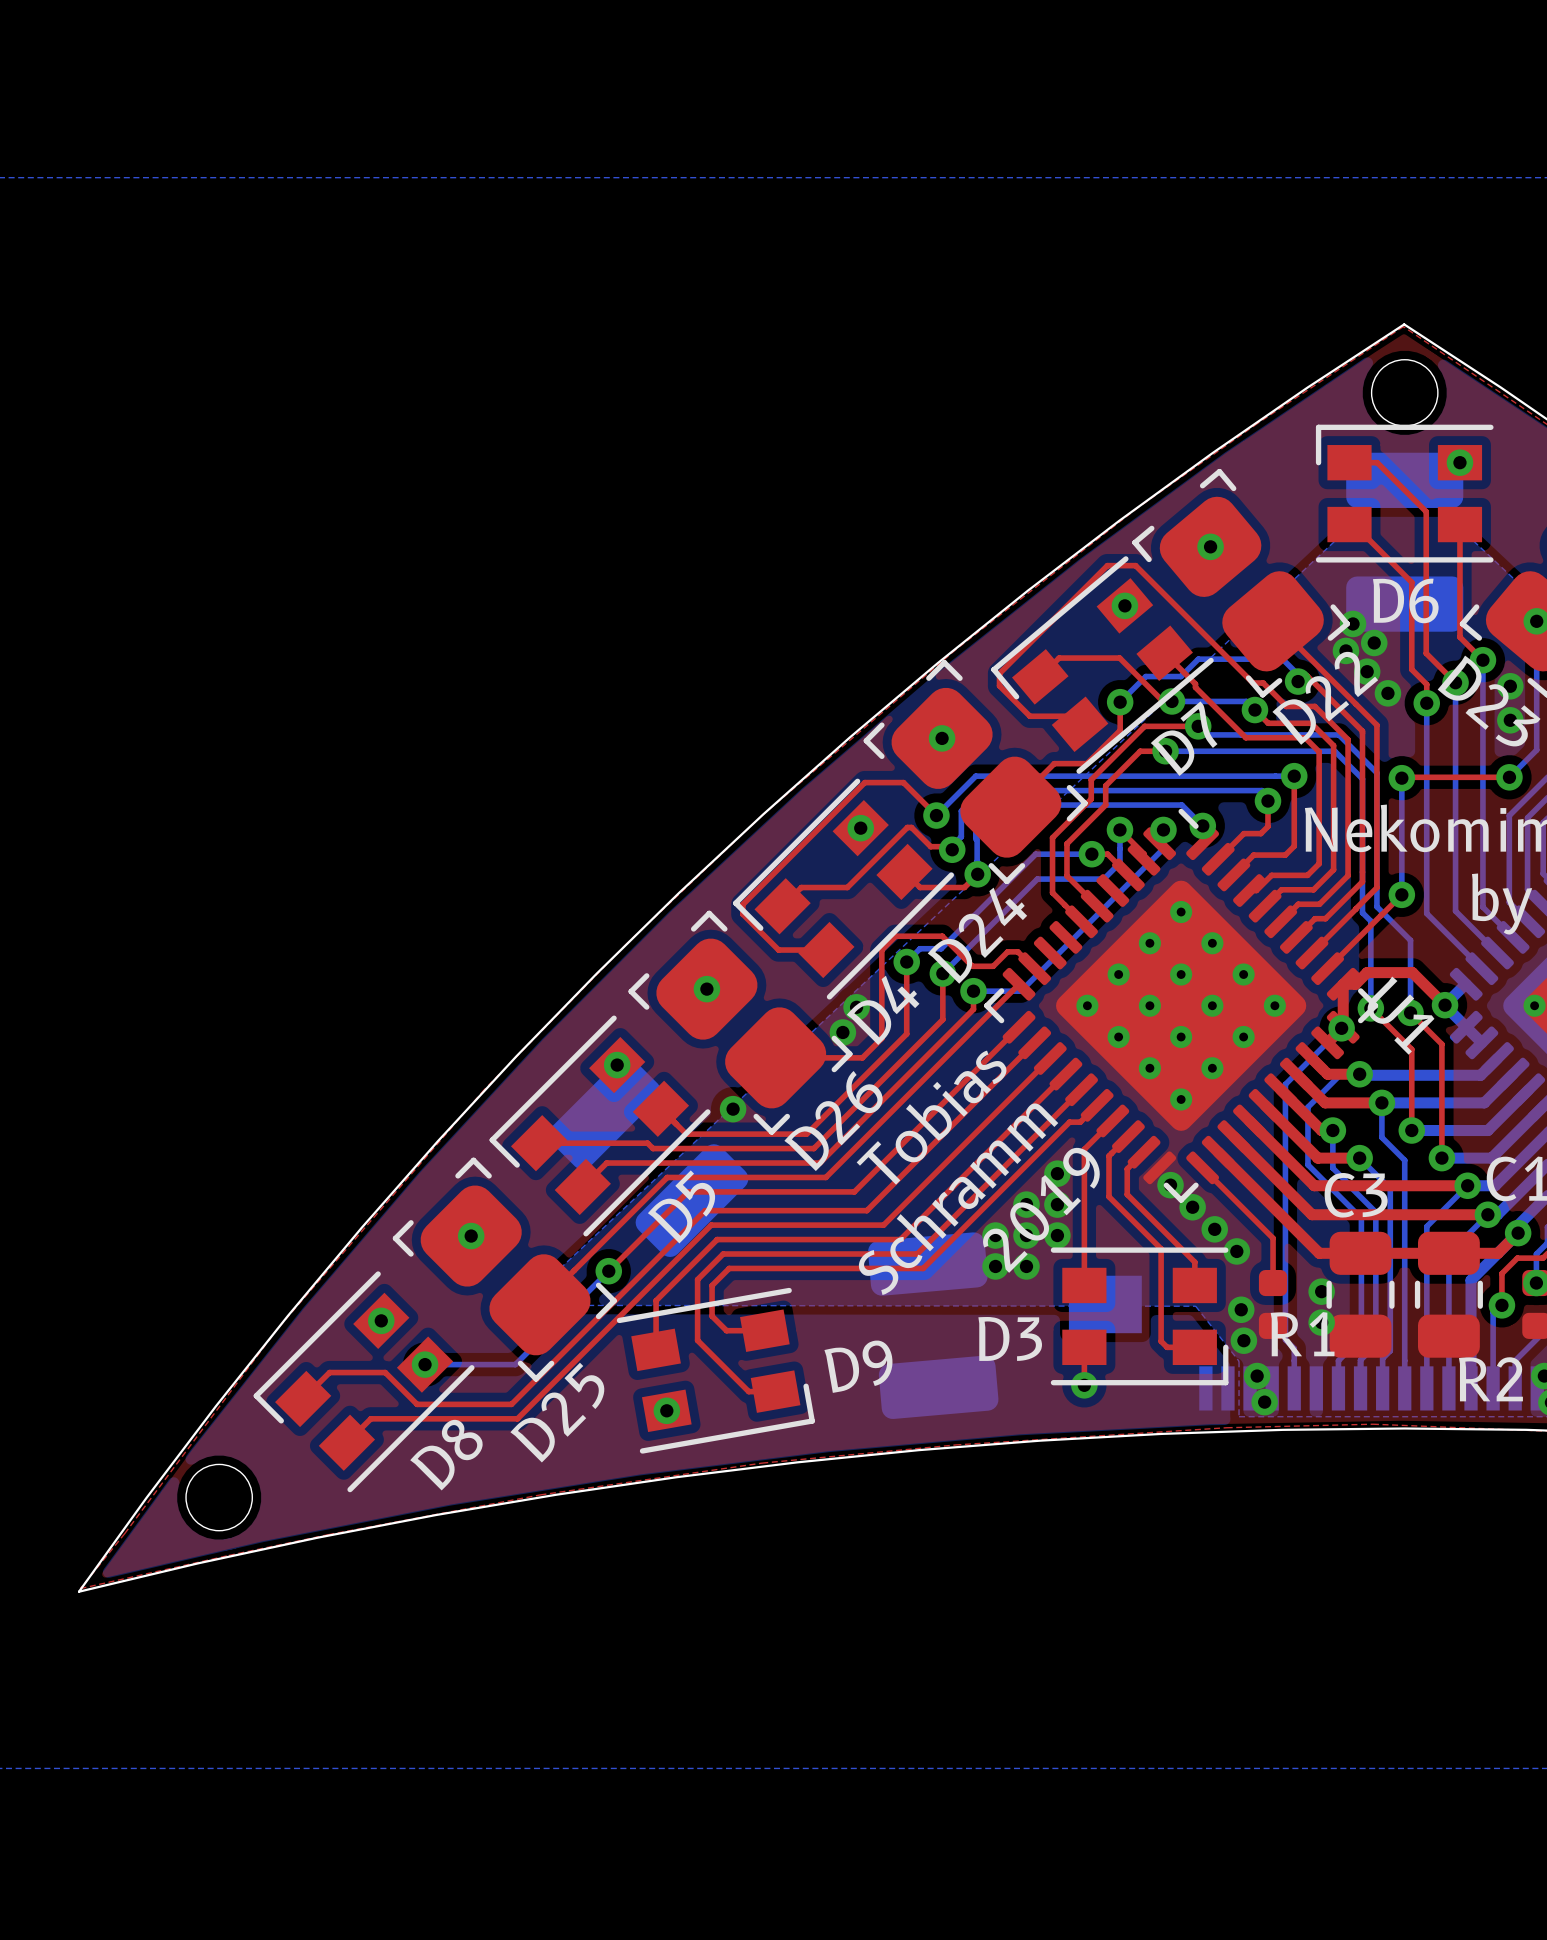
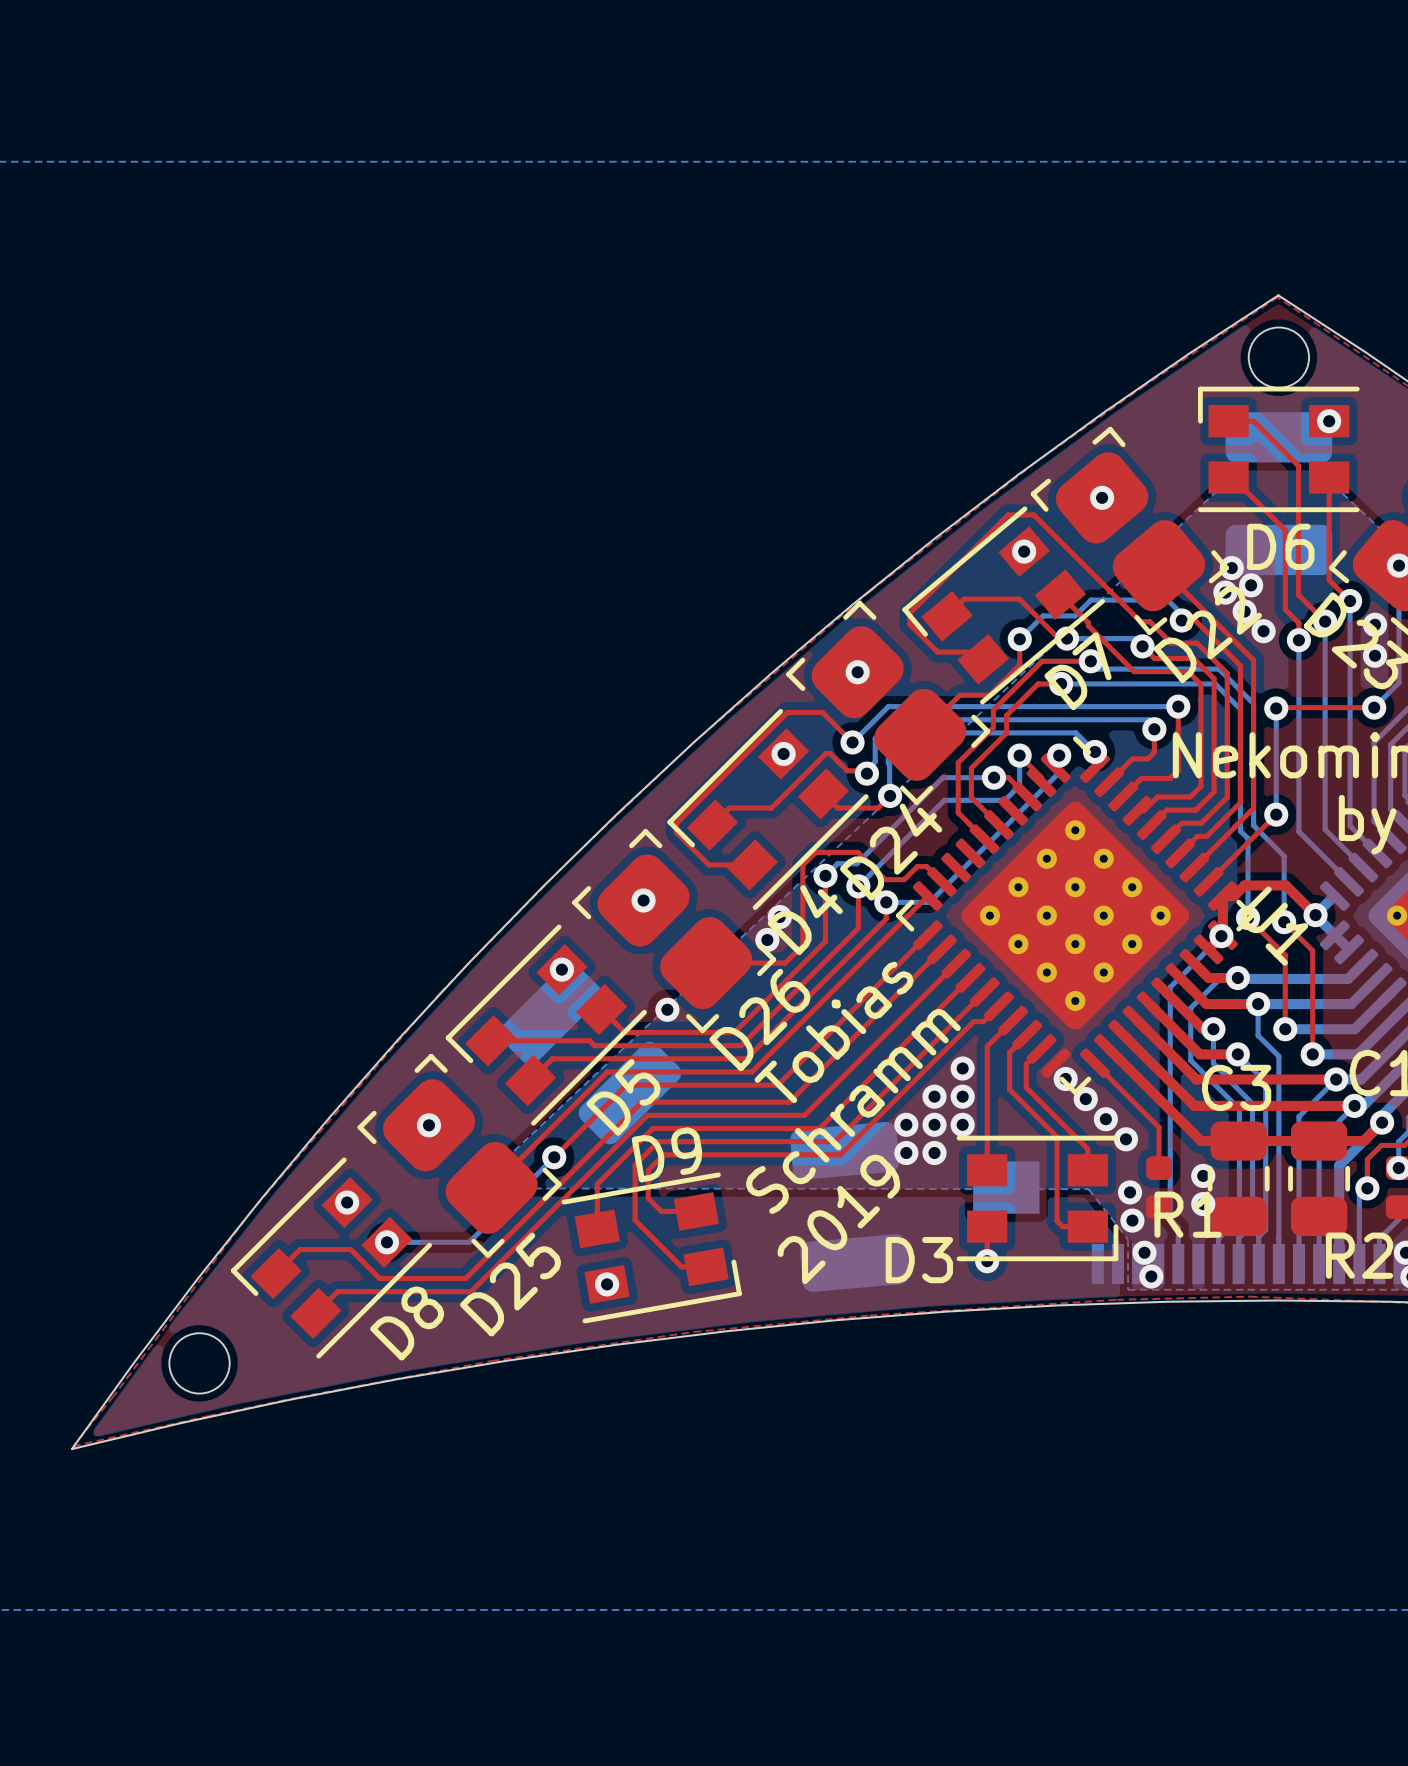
text position: 2019 (1041, 1210) -> 2019 (838, 1219)
D3 name position: D3 (1010, 1338) -> D3 (919, 1260)
D9 name position: D9 (858, 1366) -> D9 (666, 1154)

